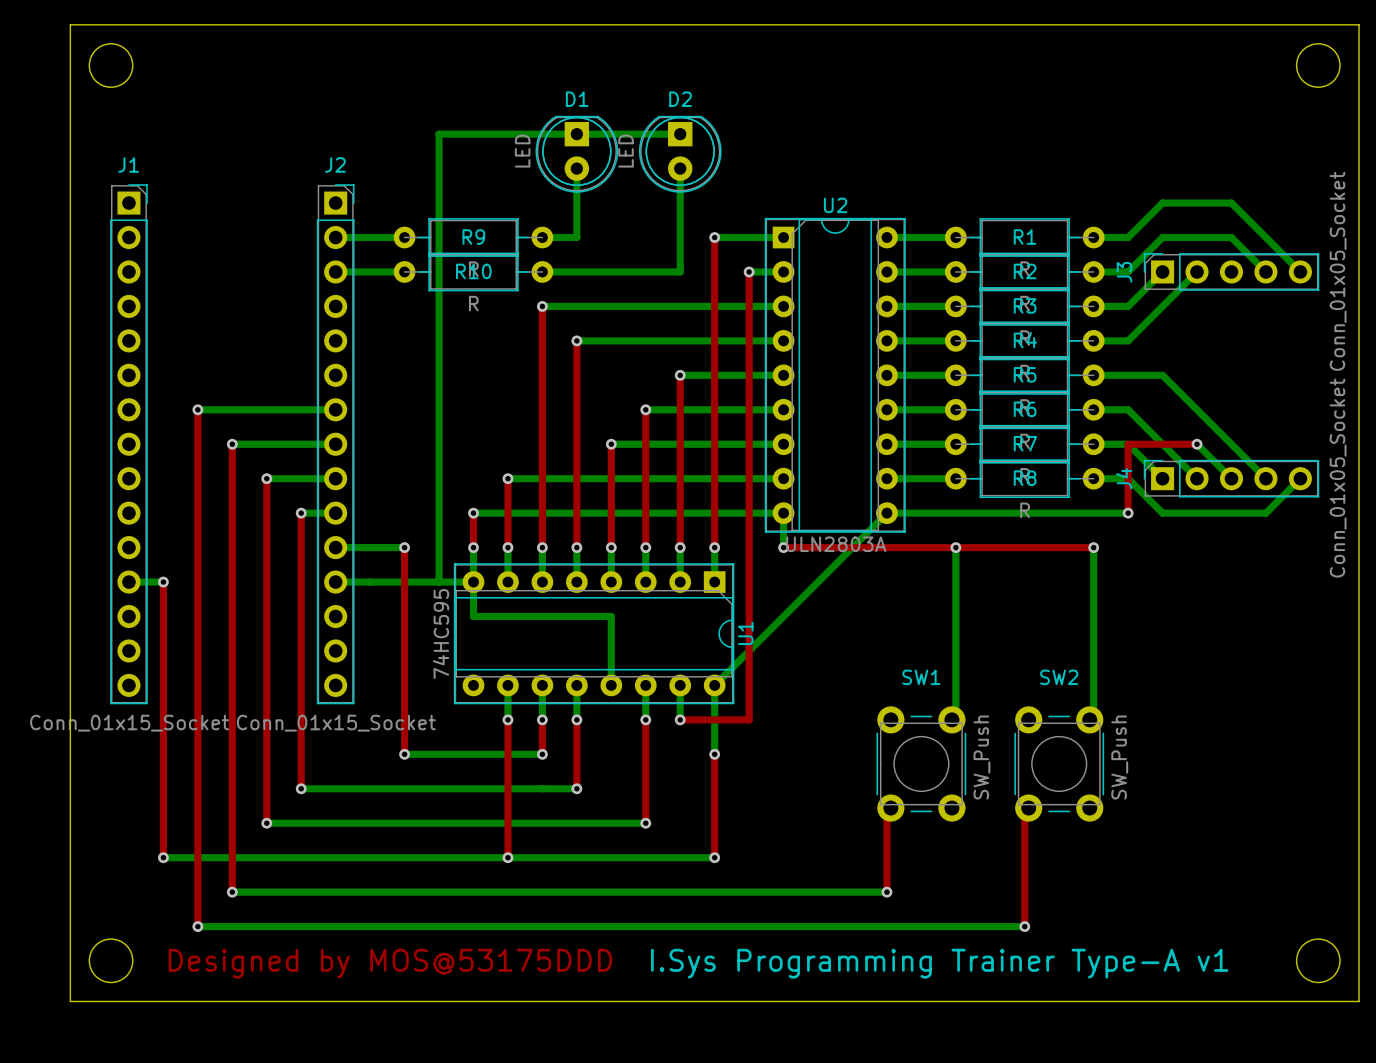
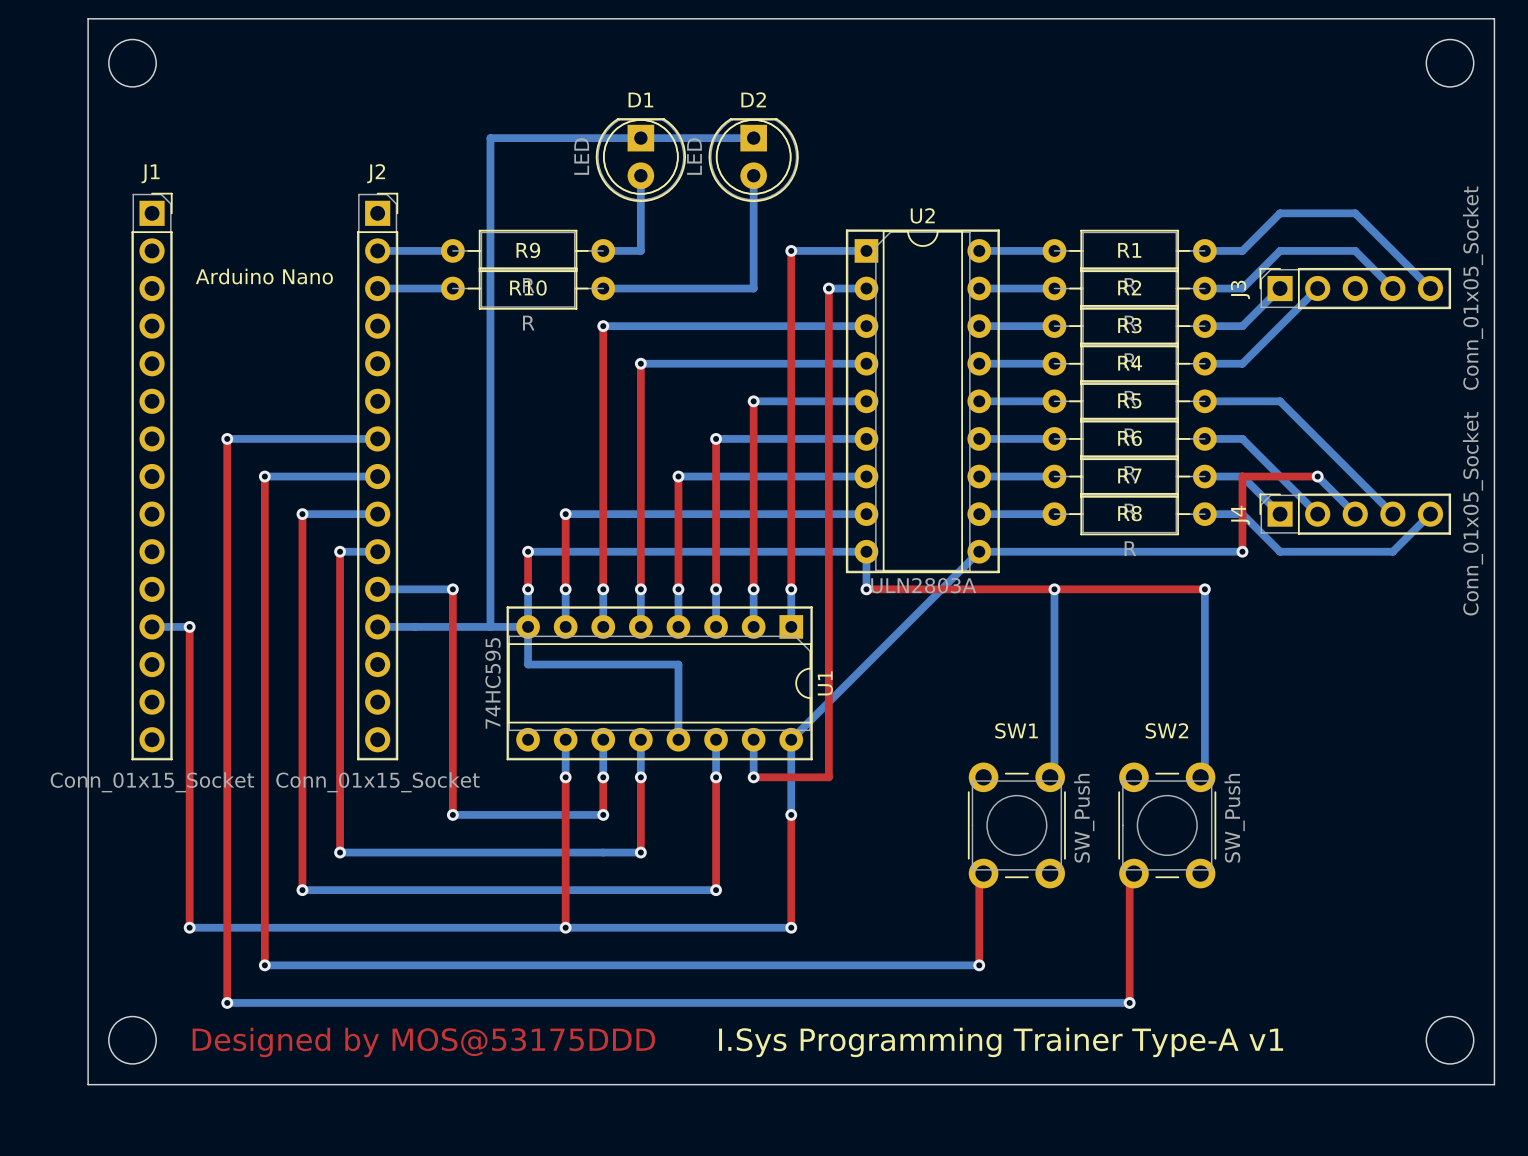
text: none -> Arduino Nano (264, 276)

